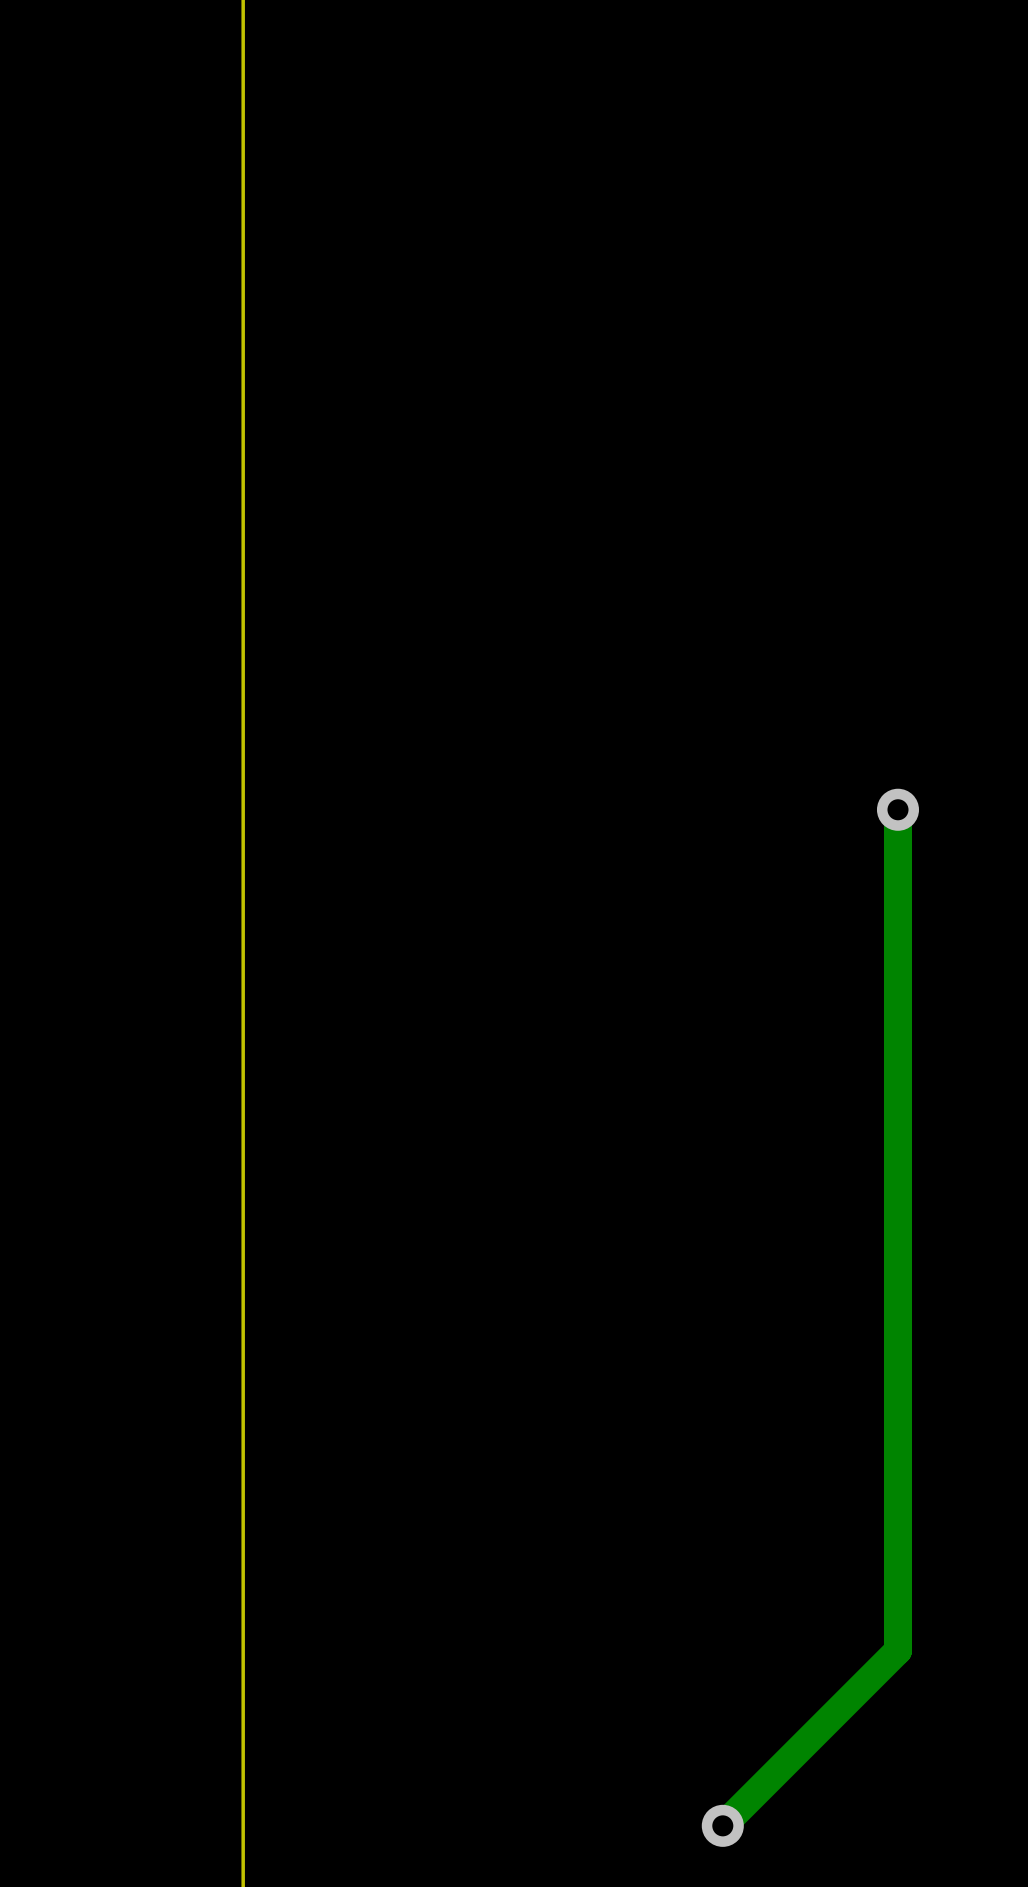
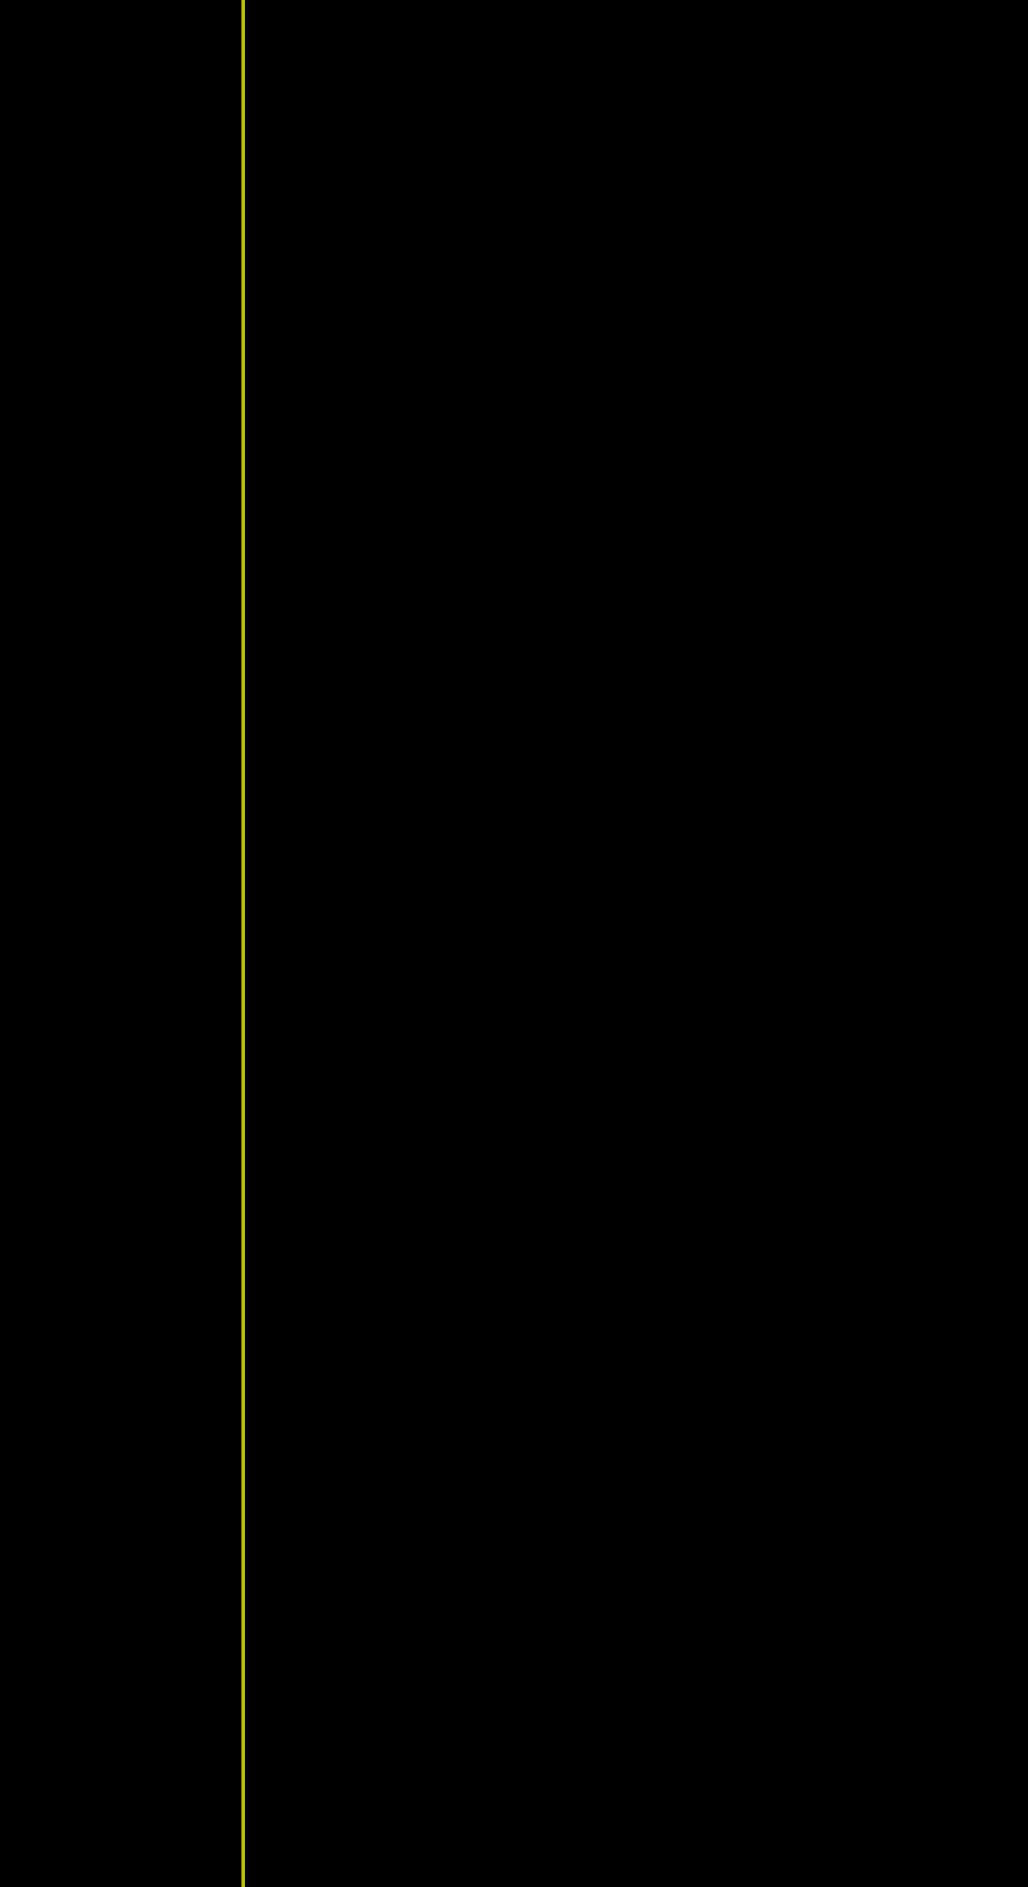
track: (897, 809) (897, 1650) (722, 1825) -> none
via: (897, 809) -> none
via: (722, 1825) -> none

